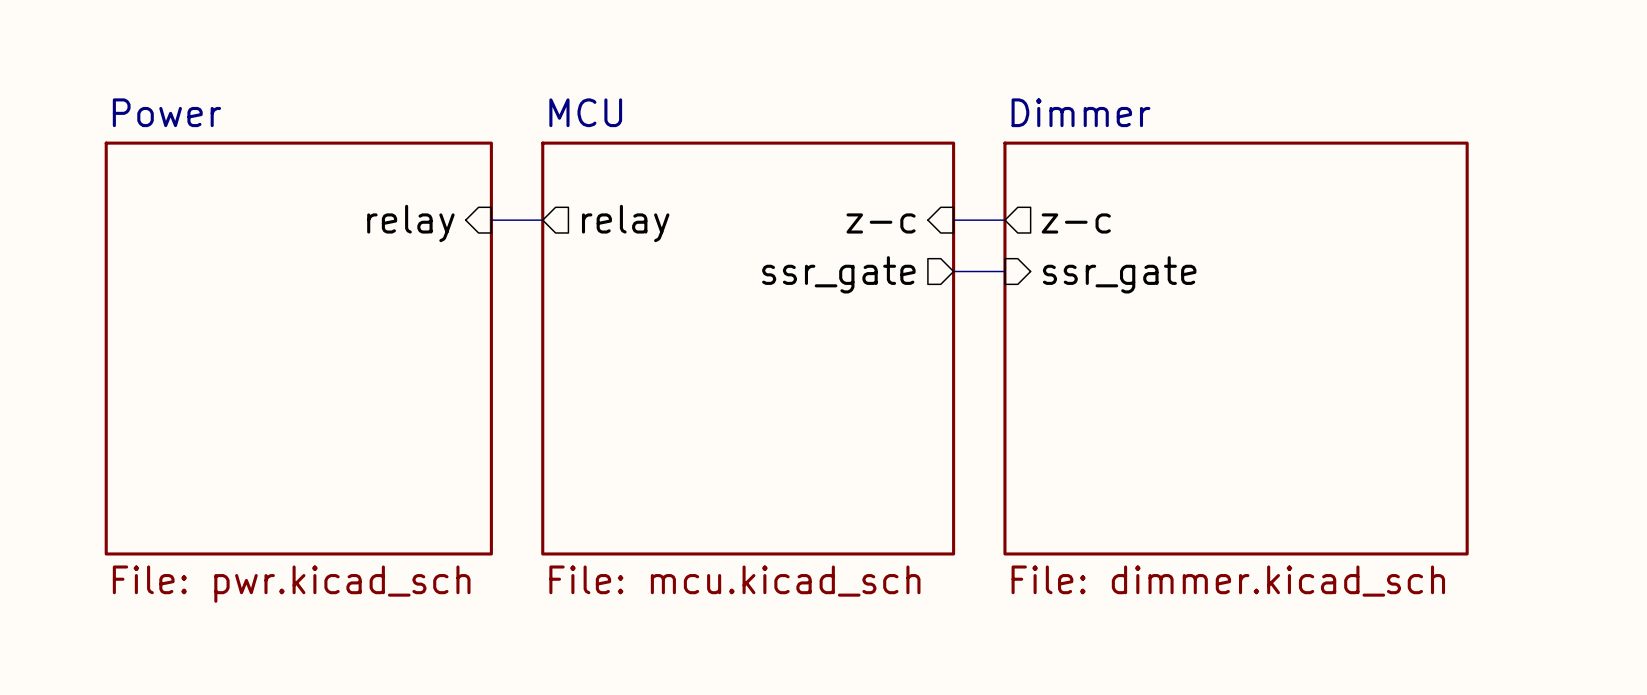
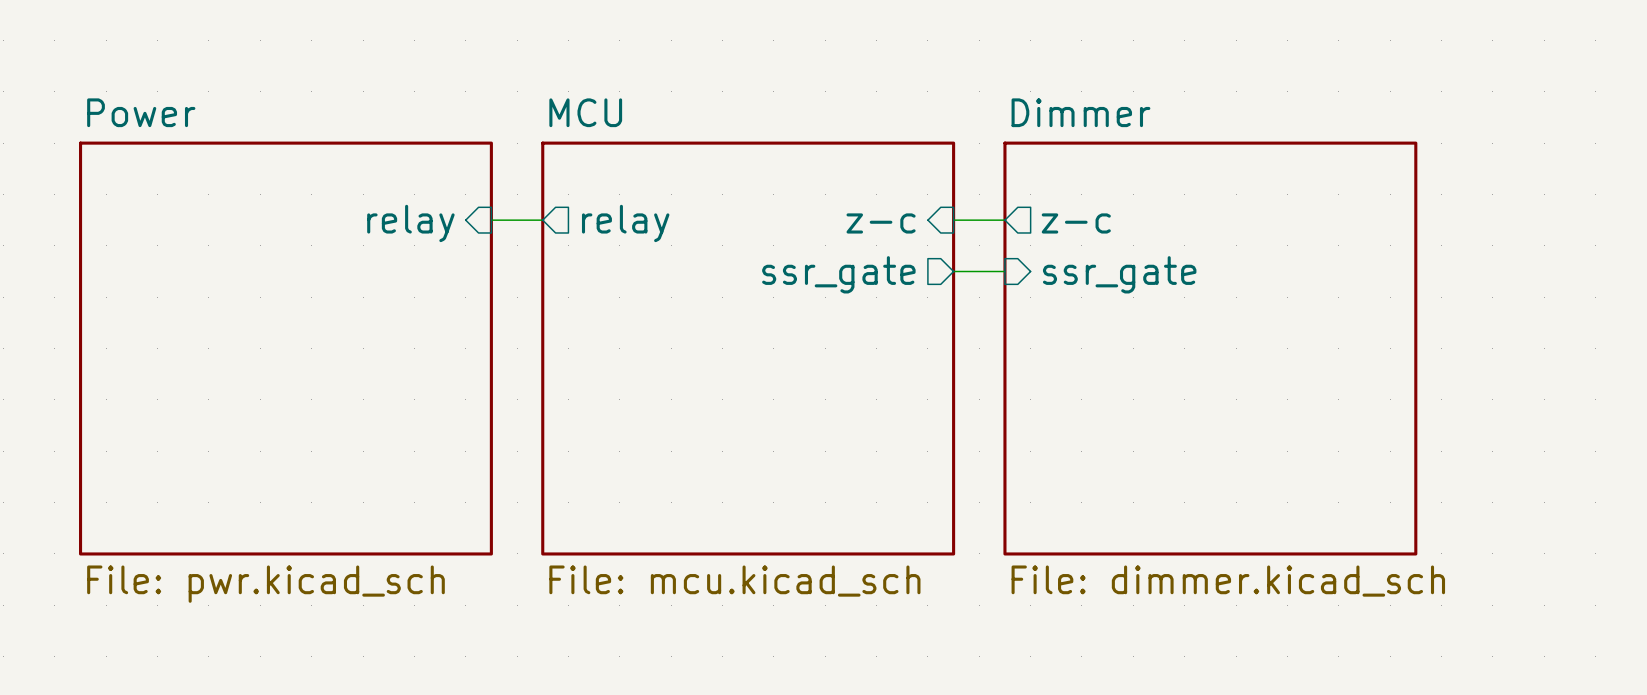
sheet Power shape: [104, 141, 493, 556] -> [79, 141, 493, 556]
sheet Dimmer: none -> File: dimmer.kicad_sch (1210, 348)
sheet Dimmer: File: dimmer.kicad_sch (1236, 348) -> none

